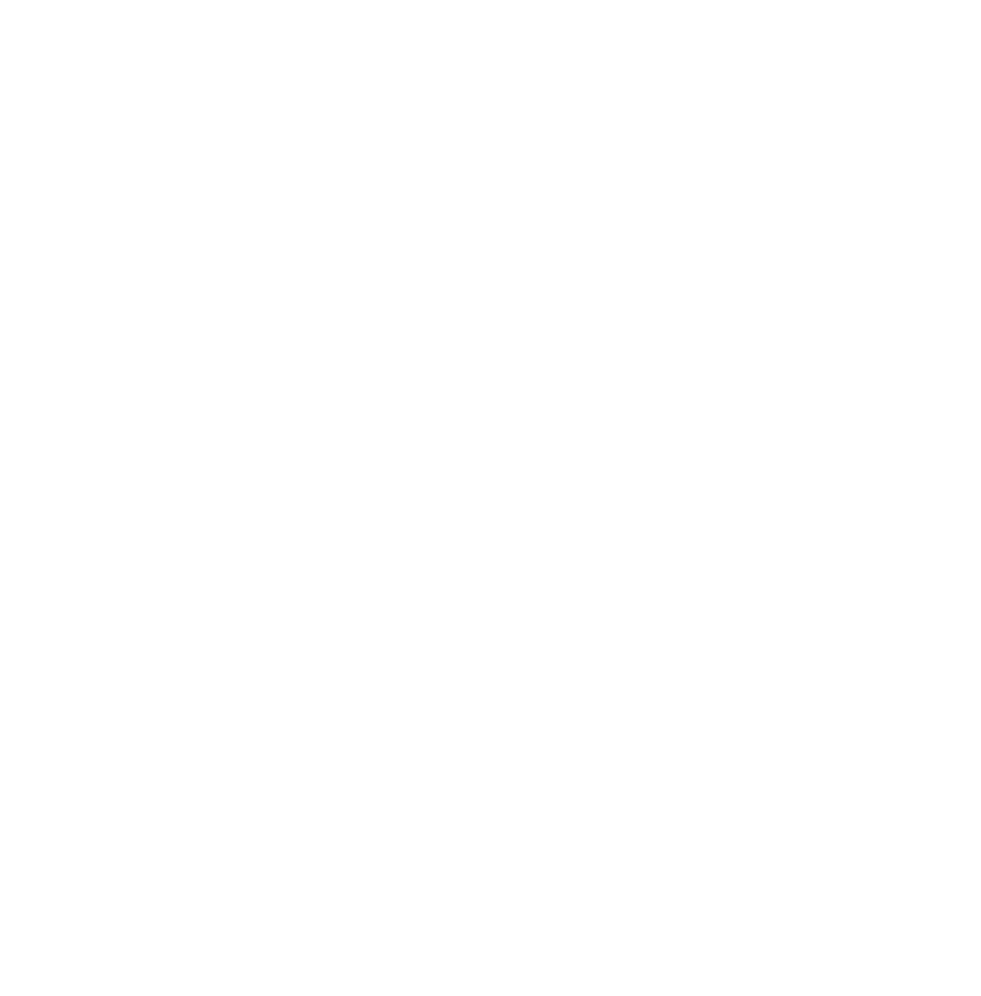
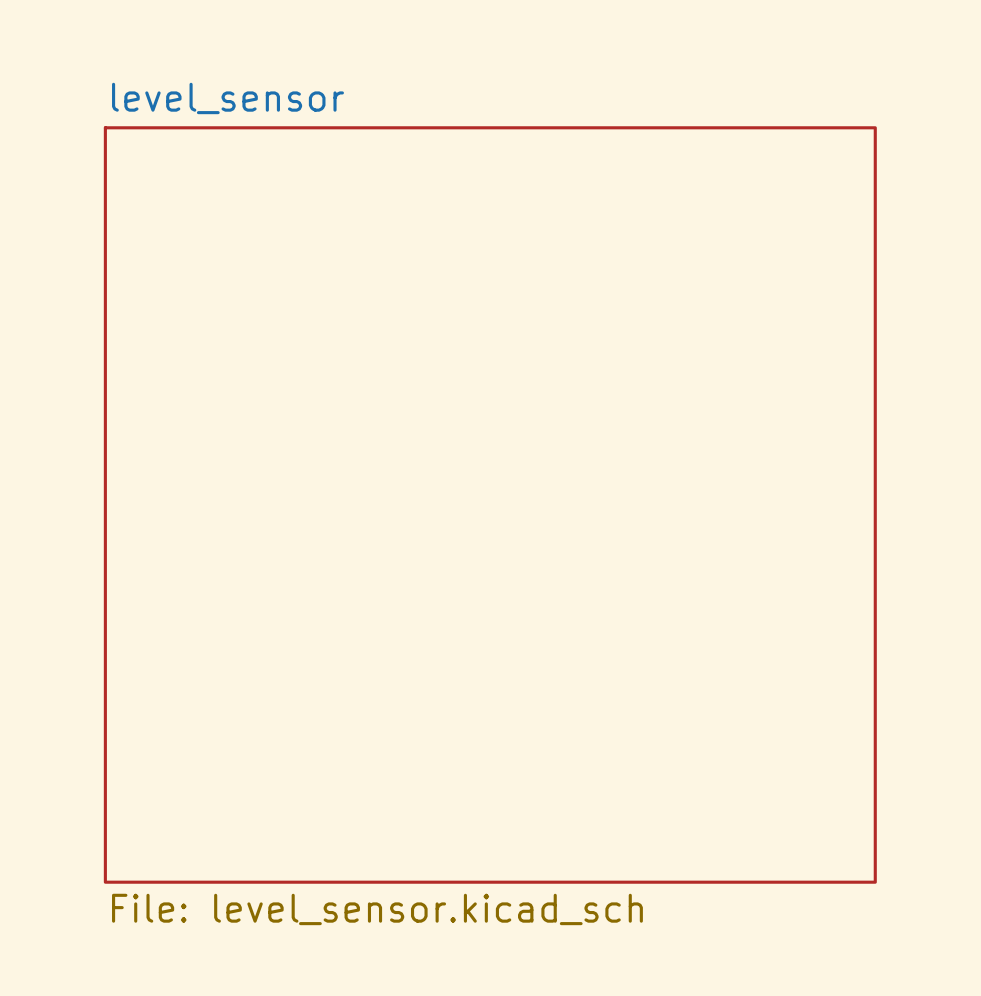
sheet level_sensor: none -> File: level_sensor.kicad_sch (490, 504)

